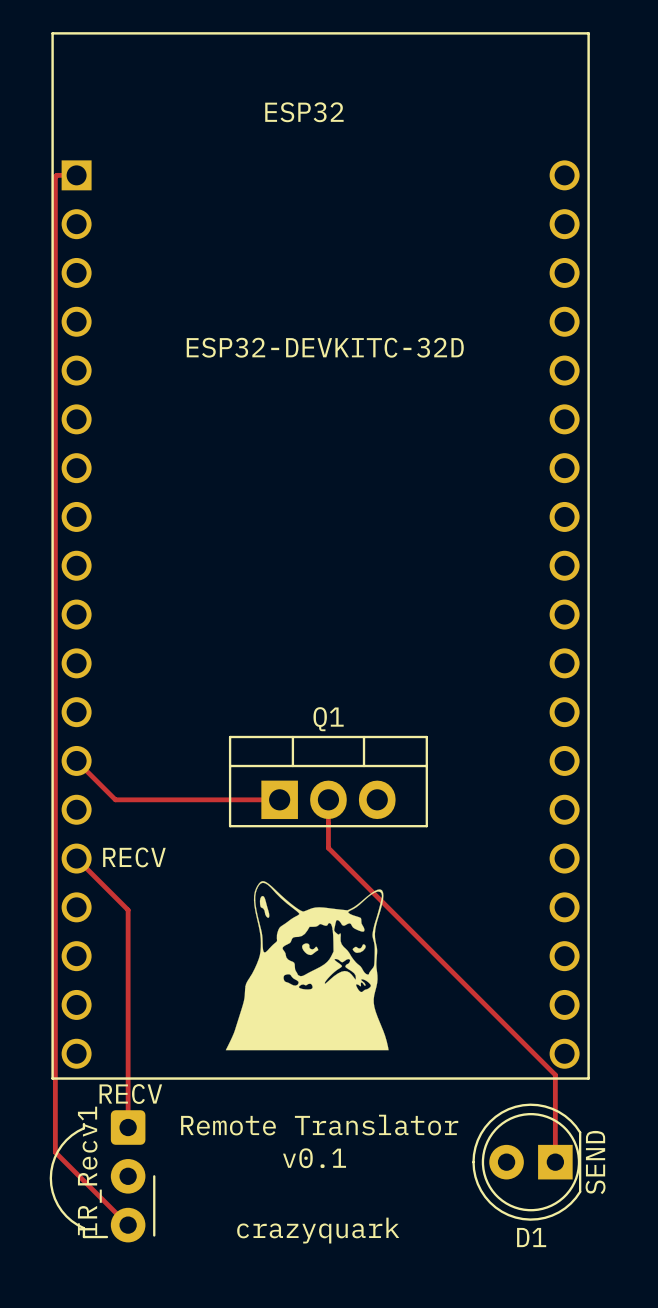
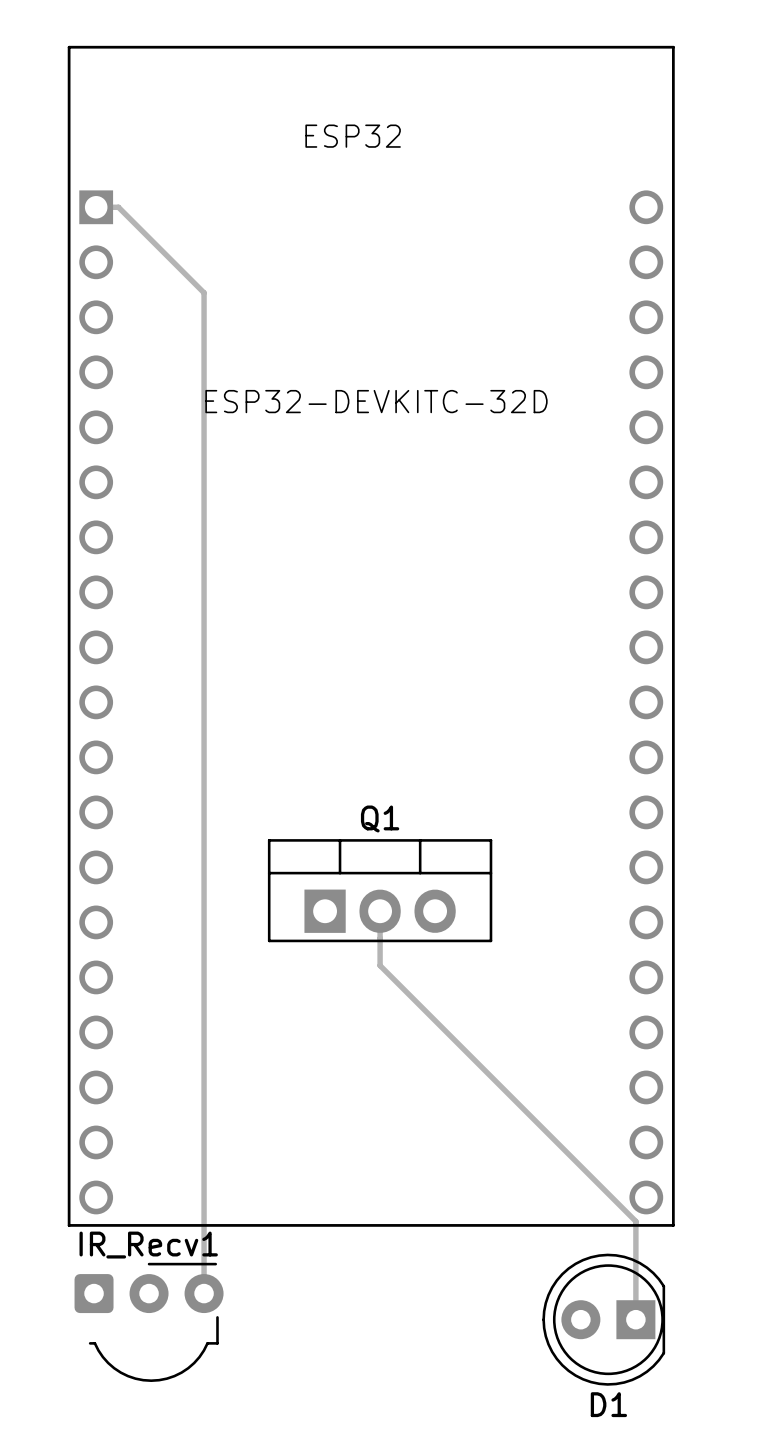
track: (76, 175) (55, 176) (55, 1152) (128, 1225) -> (96, 207) (118, 207) (204, 292) (204, 1293)
track: (76, 760) (115, 799) (279, 799) -> none
text: RECV (134, 857) -> none
track: (76, 858) (128, 910) (128, 1127) -> none
drawing: [225, 881, 389, 1051] -> none
text: RECV (130, 1094) -> none
text: Remote Translator (319, 1125) -> none
text: v0.1 (314, 1158) -> none
text: SEND (595, 1162) -> none
IR_Recv1 name position: IR_Recv1 (89, 1170) -> IR_Recv1 (148, 1245)
IR_Recv1 rotation: 0° (102, 1176) -> 90° counterclockwise (149, 1322)
text: crazyquark (318, 1230) -> none

